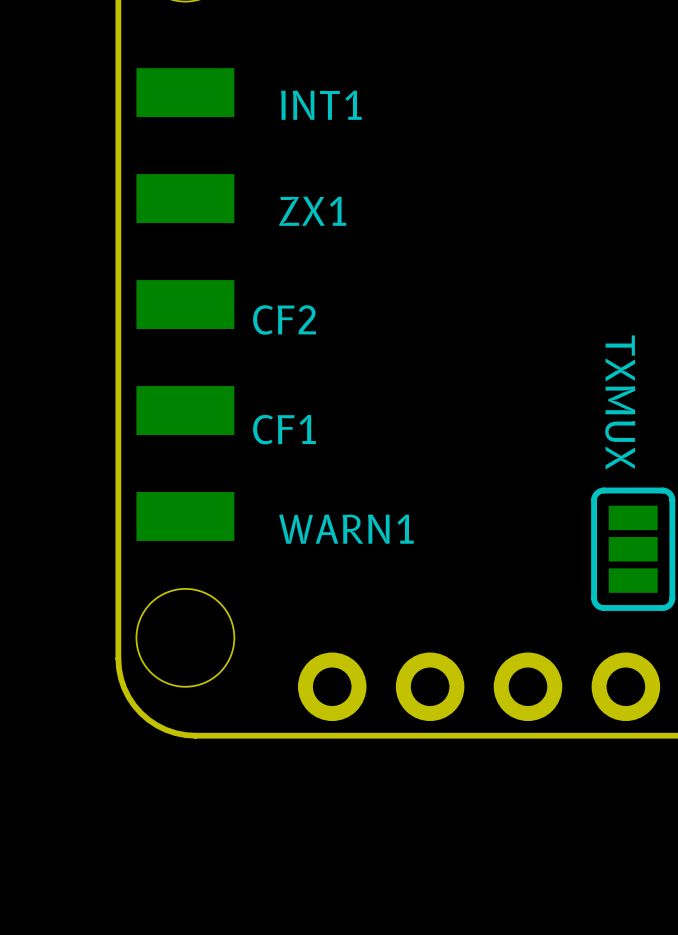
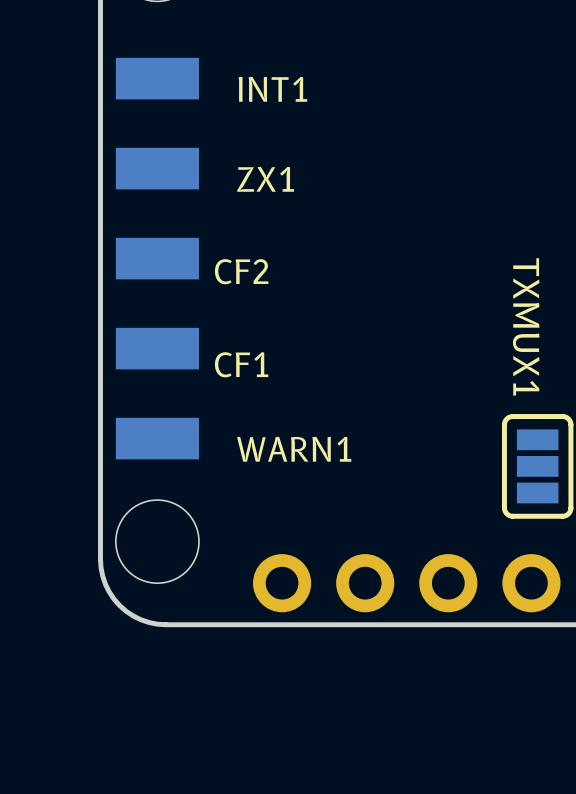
TXMUX name: TXMUX (620, 402) -> TXMUX1 (526, 326)

